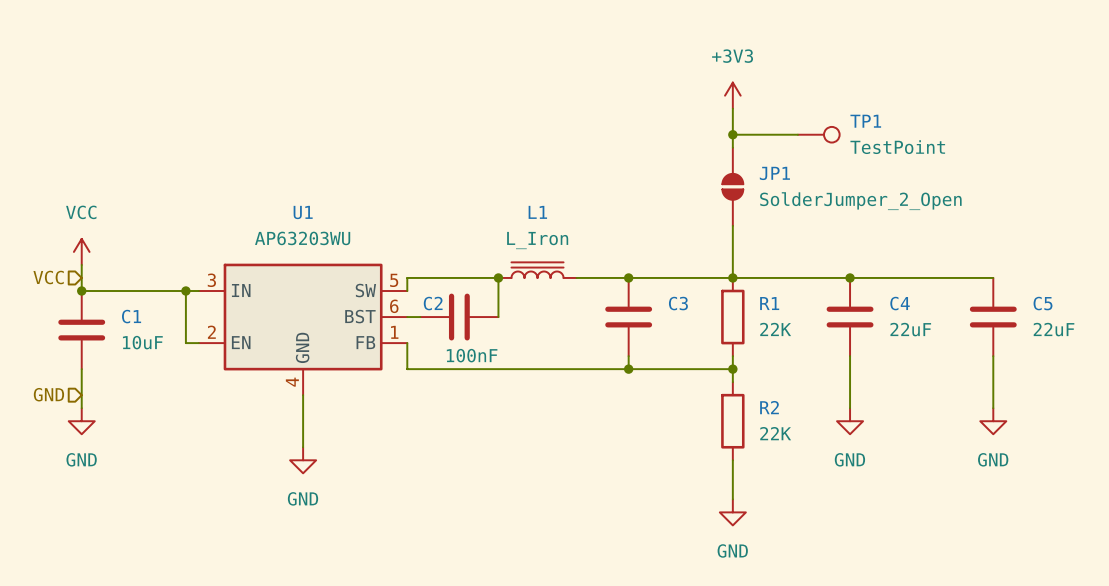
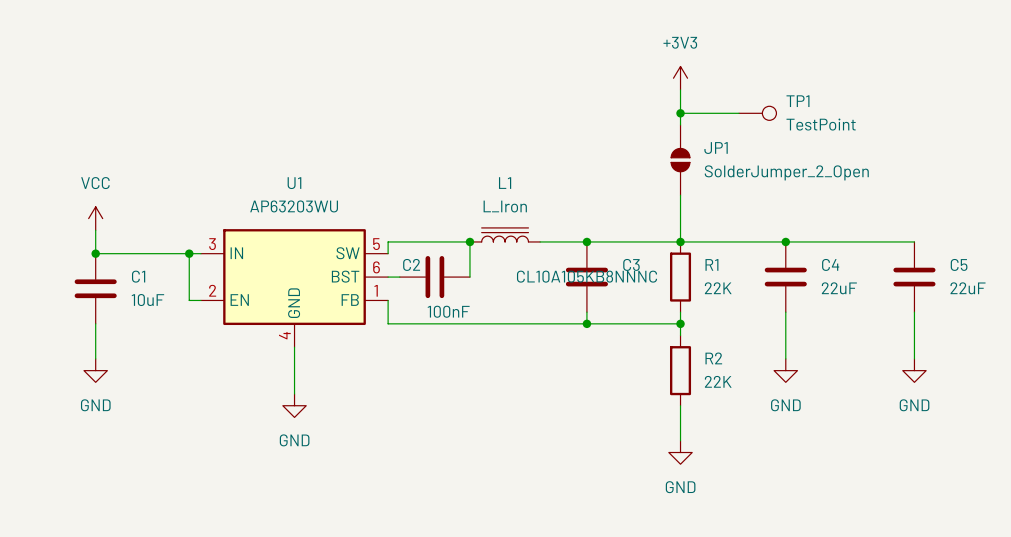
hierarchical label: VCC (48, 277) -> none
C3 text: none -> CL10A105KB8NNNC (587, 276)
hierarchical label: GND (48, 394) -> none

